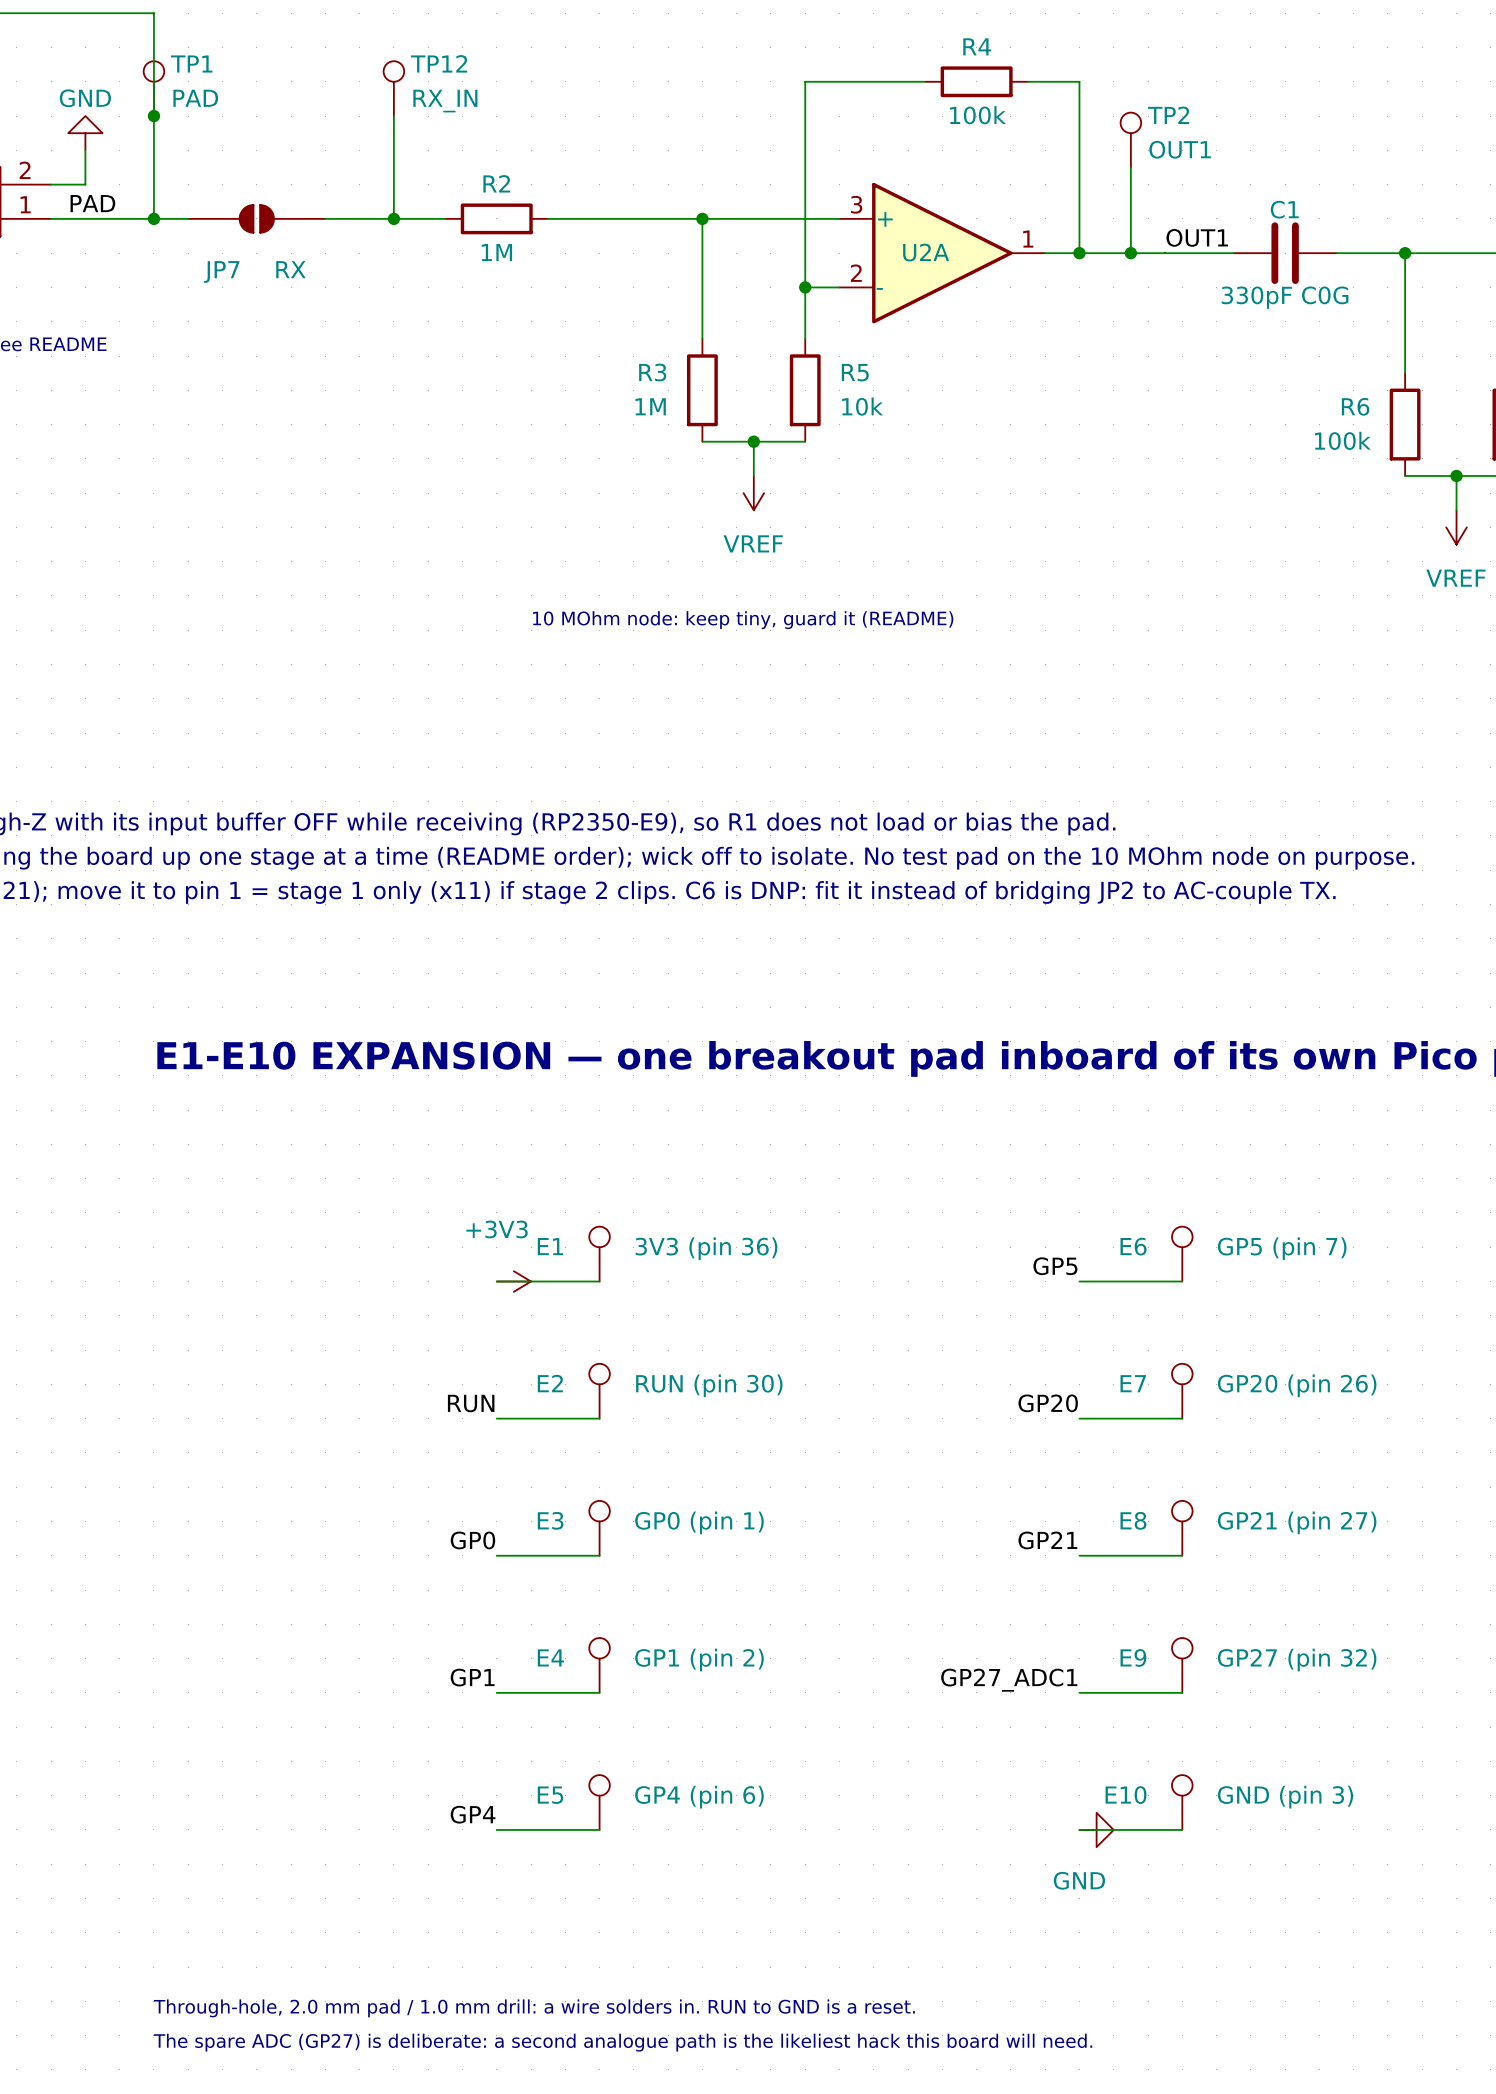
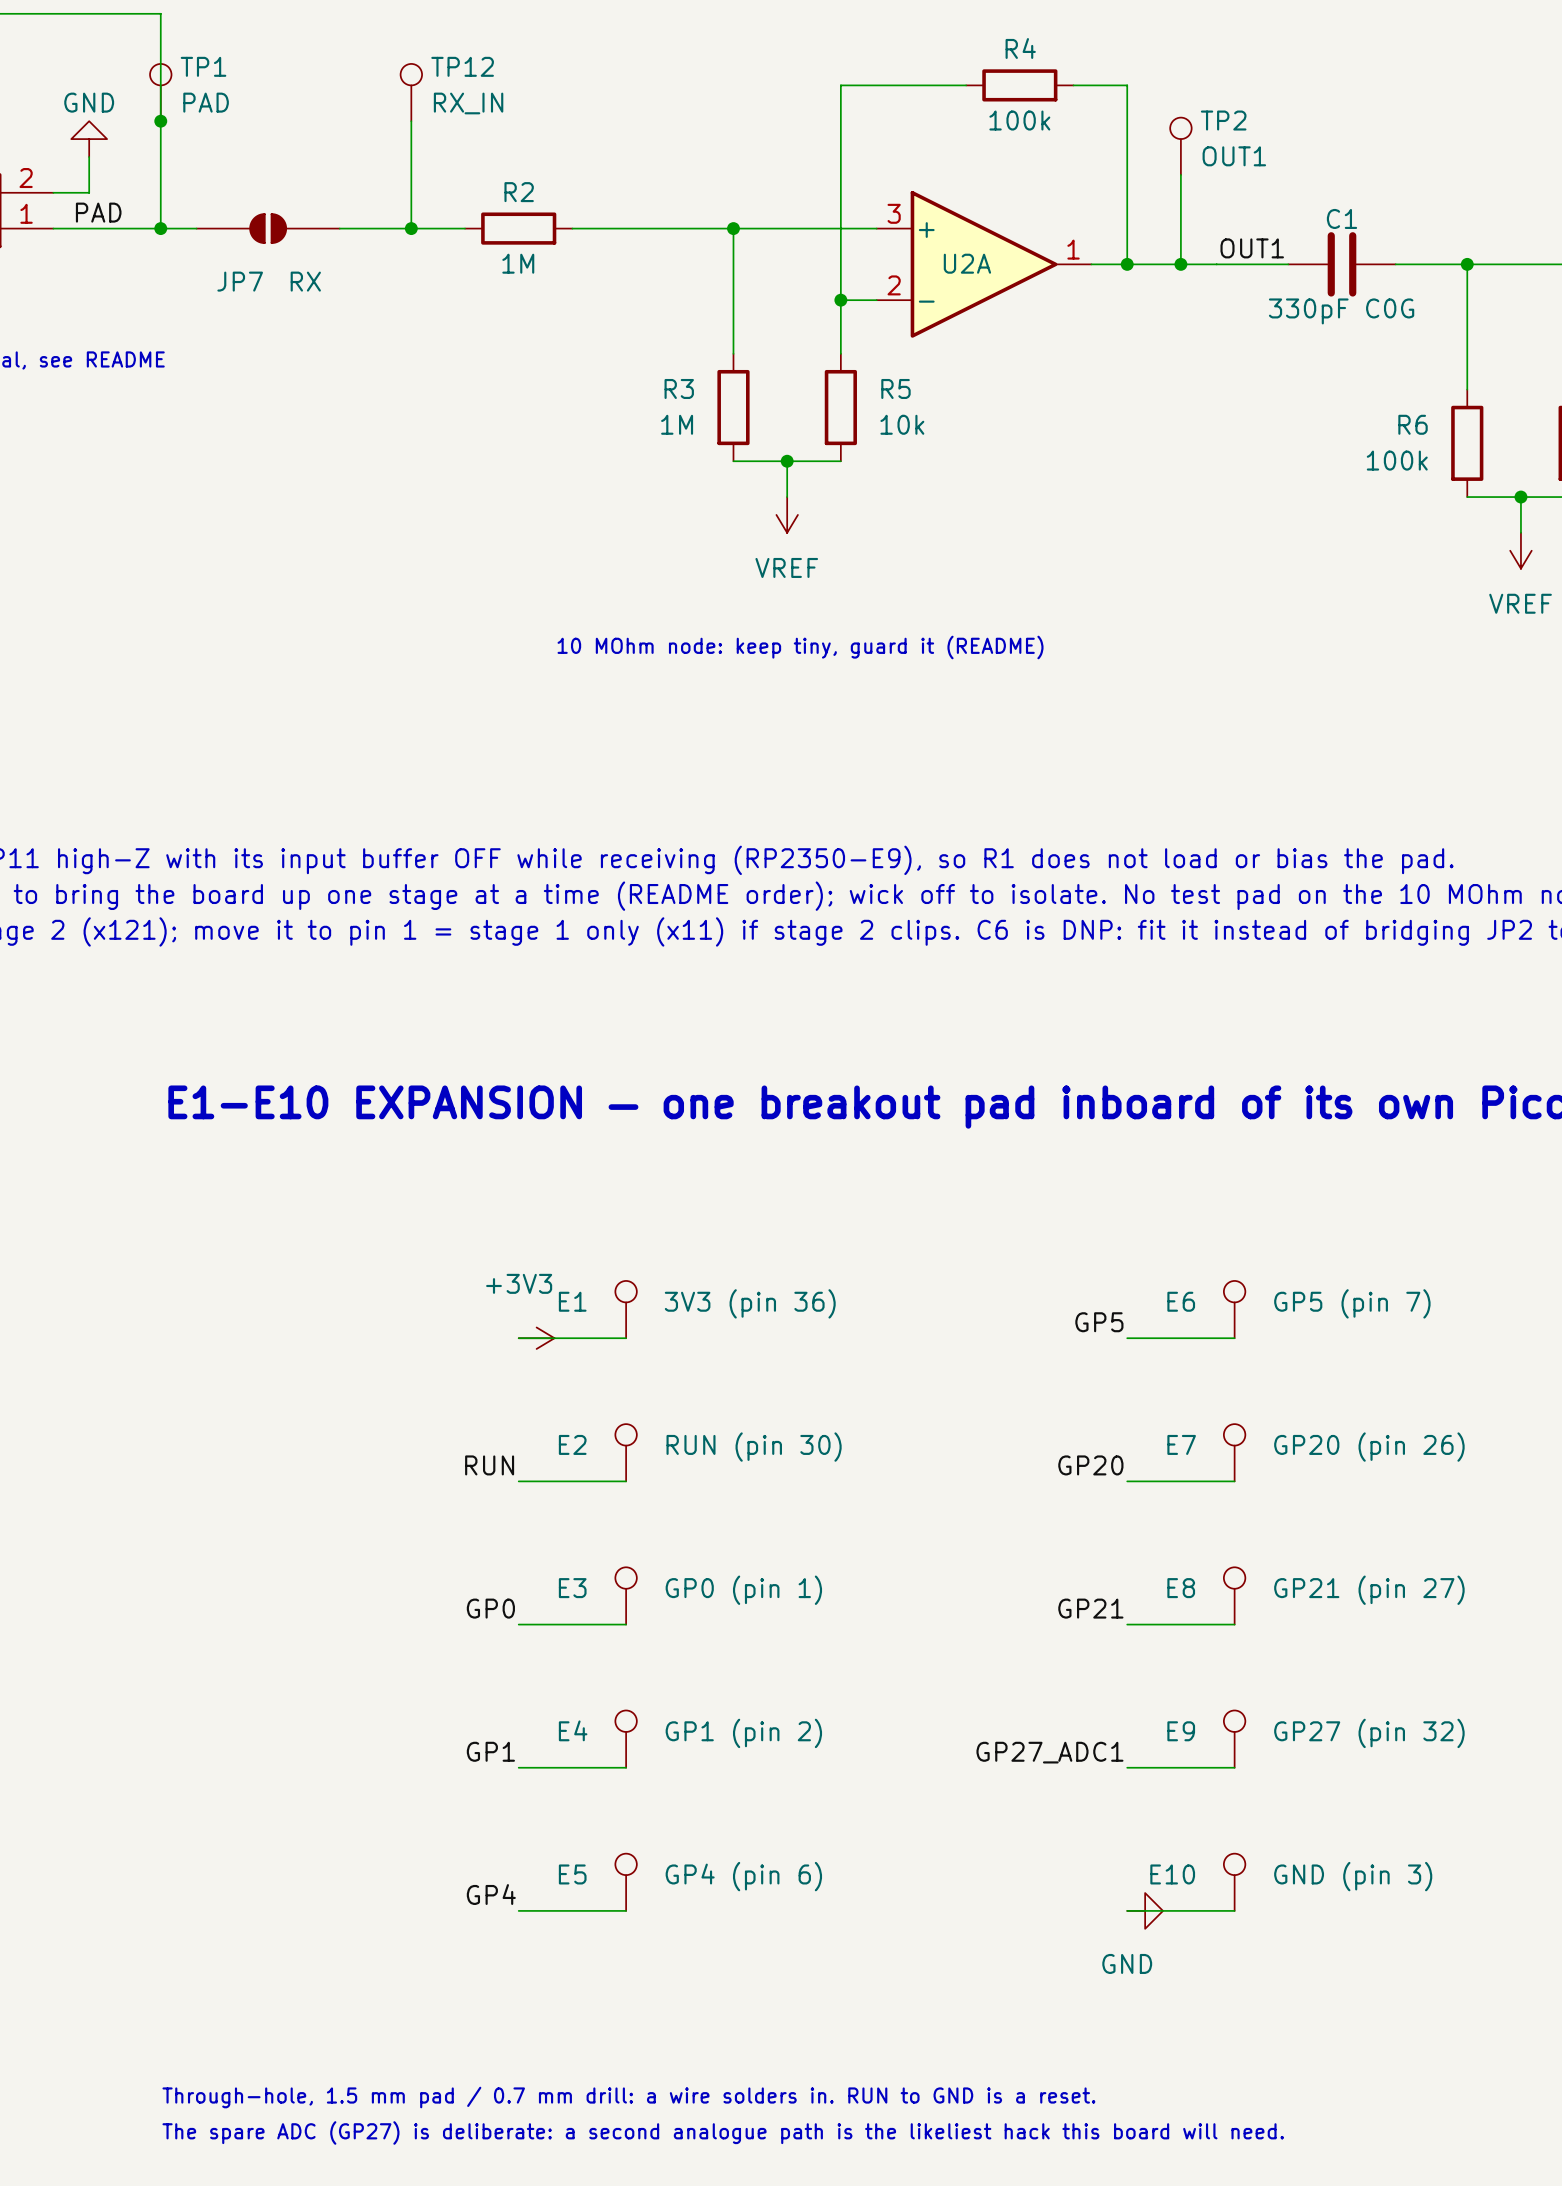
text: Through-hole, 2.0 mm pad / 1.0 mm drill: a wire solders in. RUN to GND is a reset. (534, 2008) -> Through-hole, 1.5 mm pad / 0.7 mm drill: a wire solders in. RUN to GND is a reset. (628, 2097)

